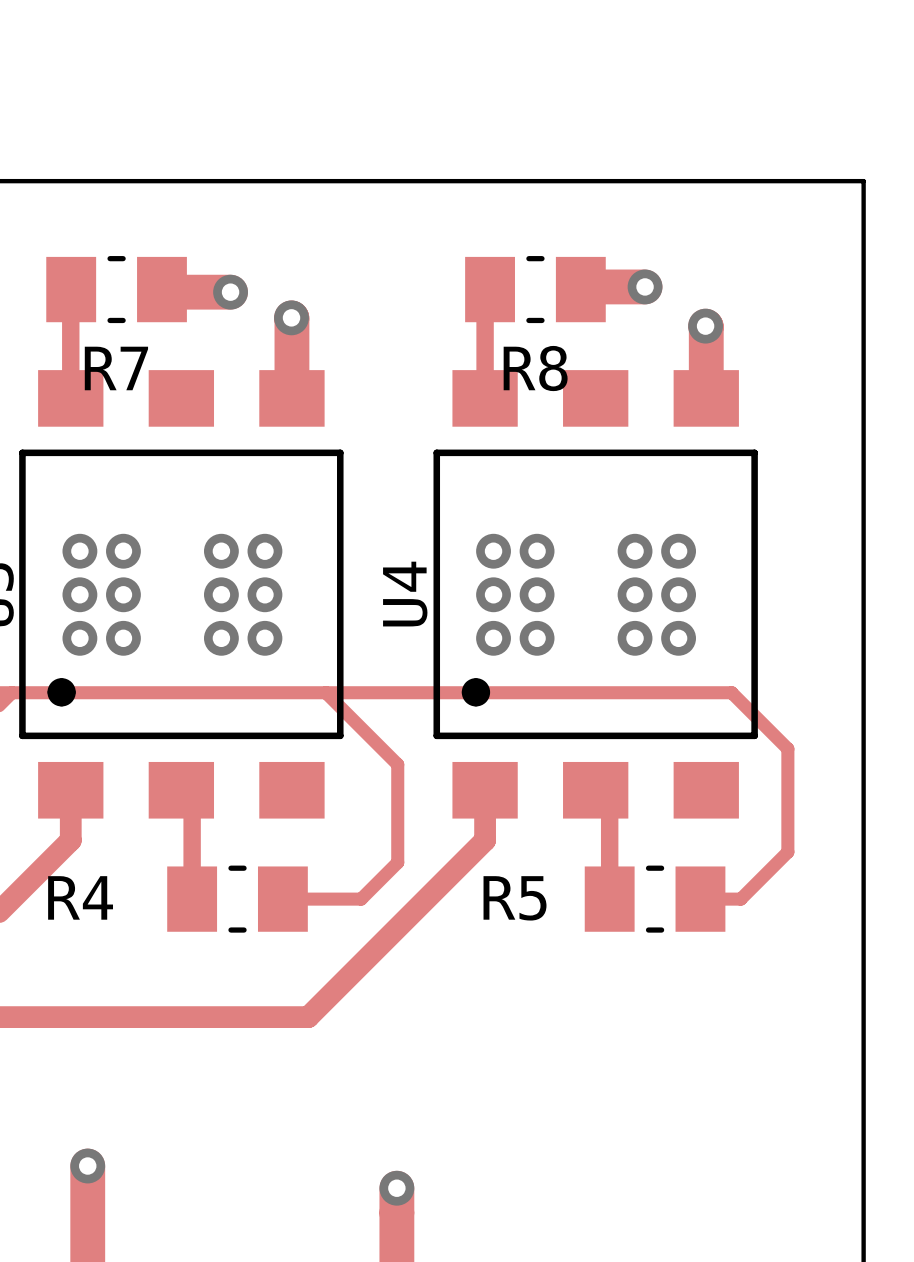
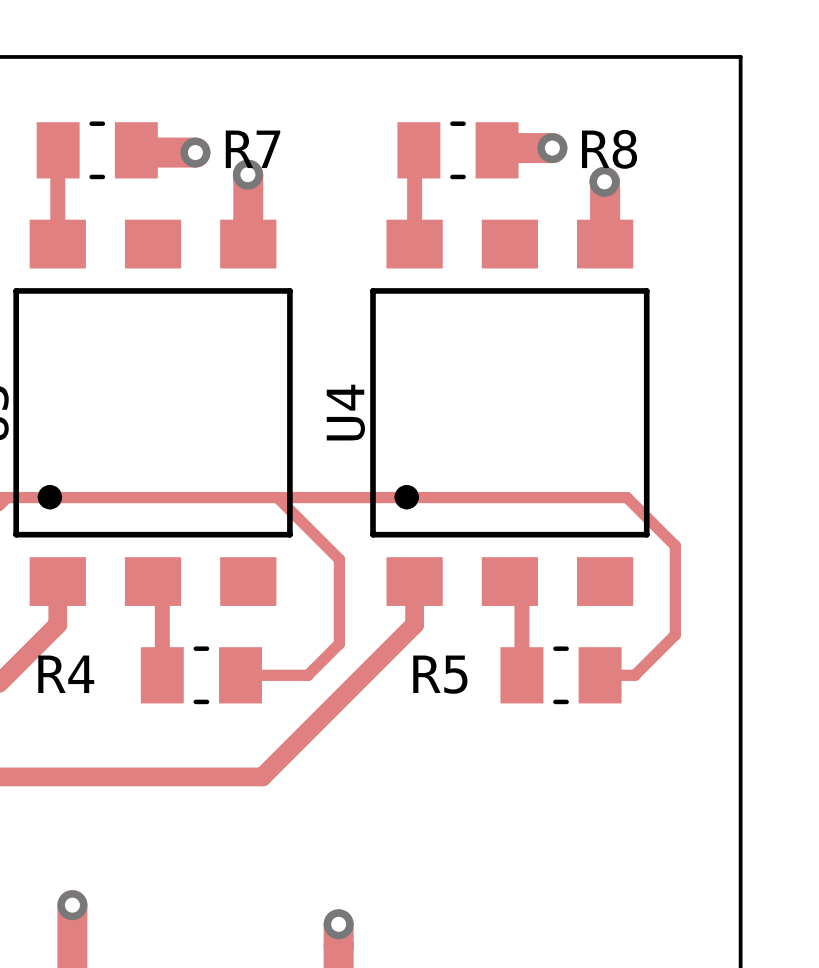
R7 name position: R7 (116, 368) -> R7 (253, 149)
R8 name position: R8 (535, 368) -> R8 (609, 149)
via: (79, 551) -> none
via: (123, 551) -> none
via: (221, 551) -> none
via: (264, 551) -> none
via: (493, 551) -> none
via: (537, 551) -> none
via: (635, 551) -> none
via: (678, 551) -> none
via: (79, 594) -> none
via: (123, 594) -> none
via: (221, 594) -> none
via: (264, 594) -> none
via: (493, 594) -> none
via: (537, 594) -> none
via: (635, 594) -> none
via: (678, 594) -> none
via: (79, 638) -> none
via: (123, 638) -> none
via: (221, 638) -> none
via: (264, 638) -> none
via: (493, 638) -> none
via: (537, 638) -> none
via: (635, 638) -> none
via: (678, 638) -> none

